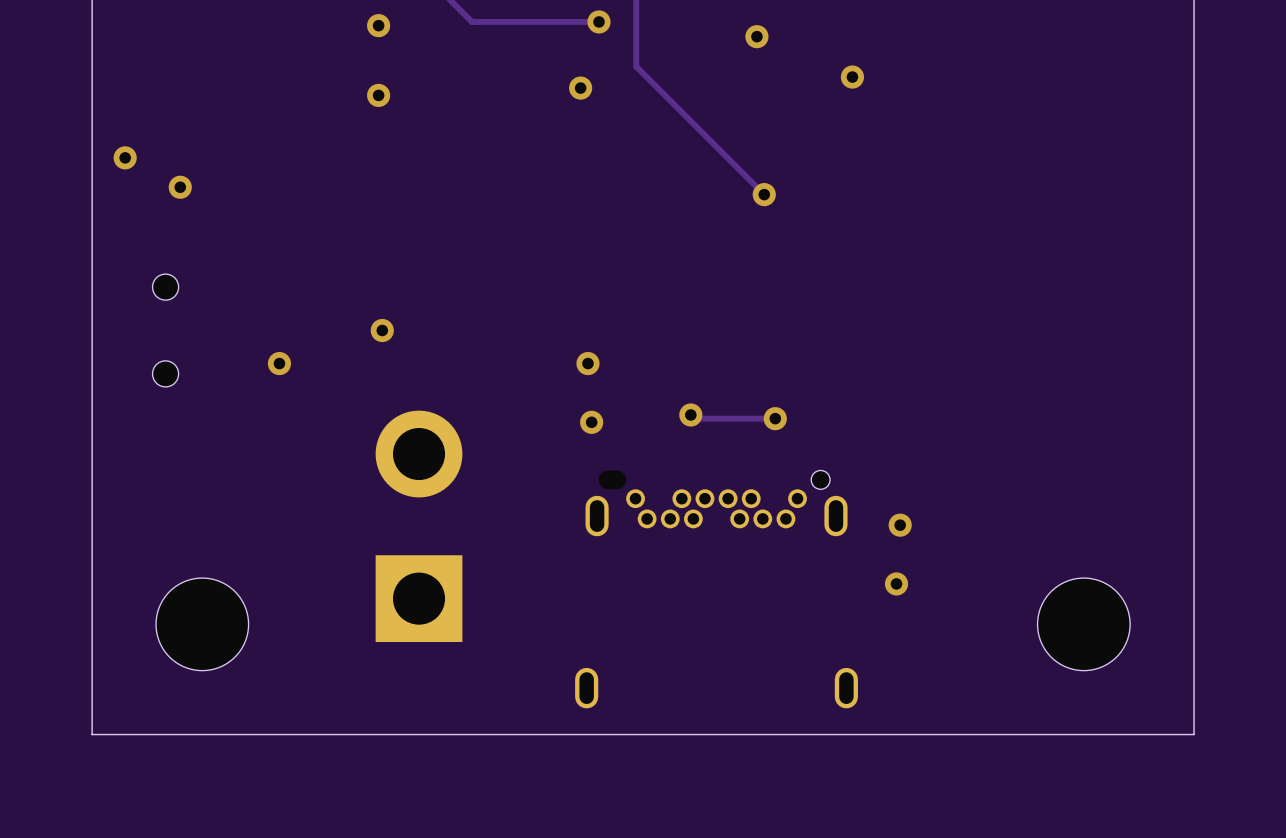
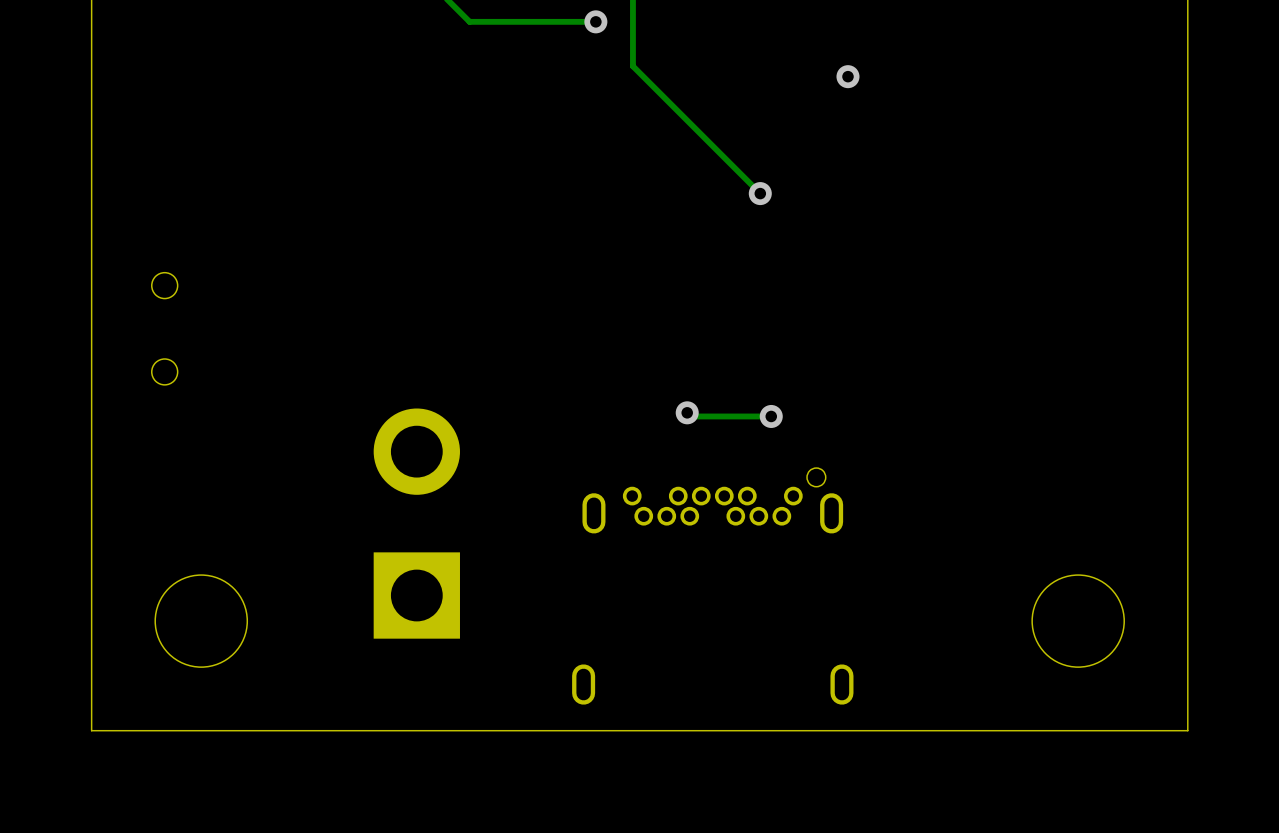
via: (378, 25) -> none
via: (756, 36) -> none
via: (580, 88) -> none
via: (378, 95) -> none
via: (125, 157) -> none
via: (180, 187) -> none
via: (382, 330) -> none
via: (279, 363) -> none
via: (587, 363) -> none
via: (591, 422) -> none
via: (900, 525) -> none
via: (896, 583) -> none

